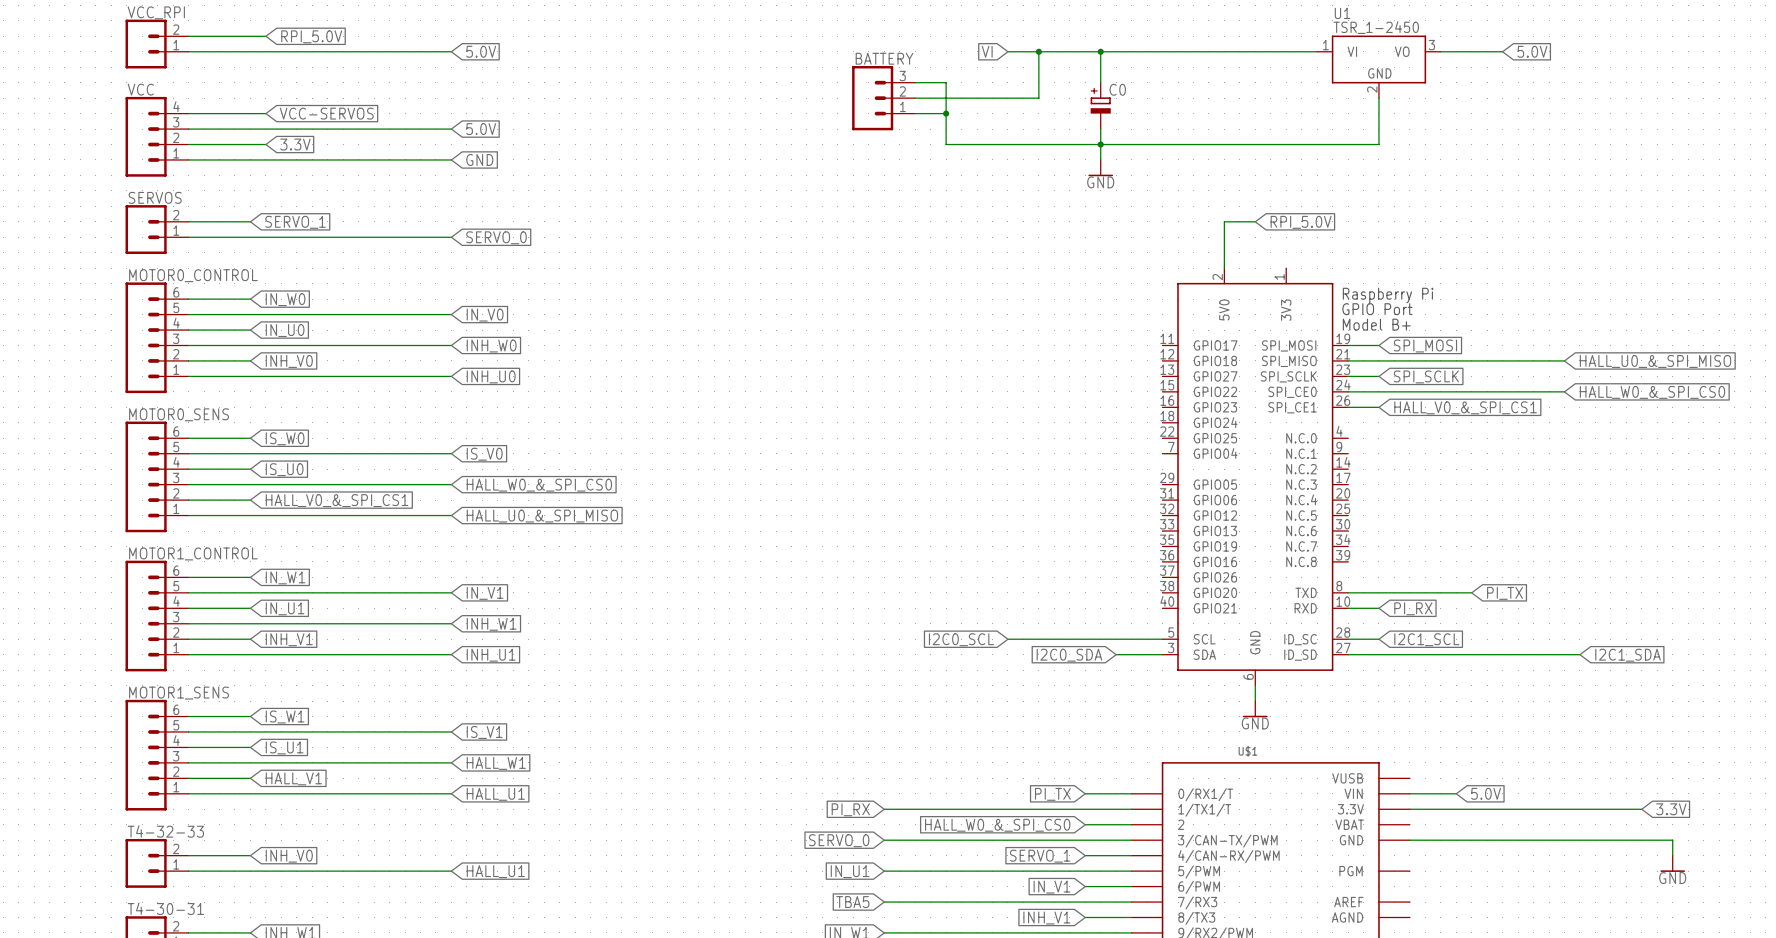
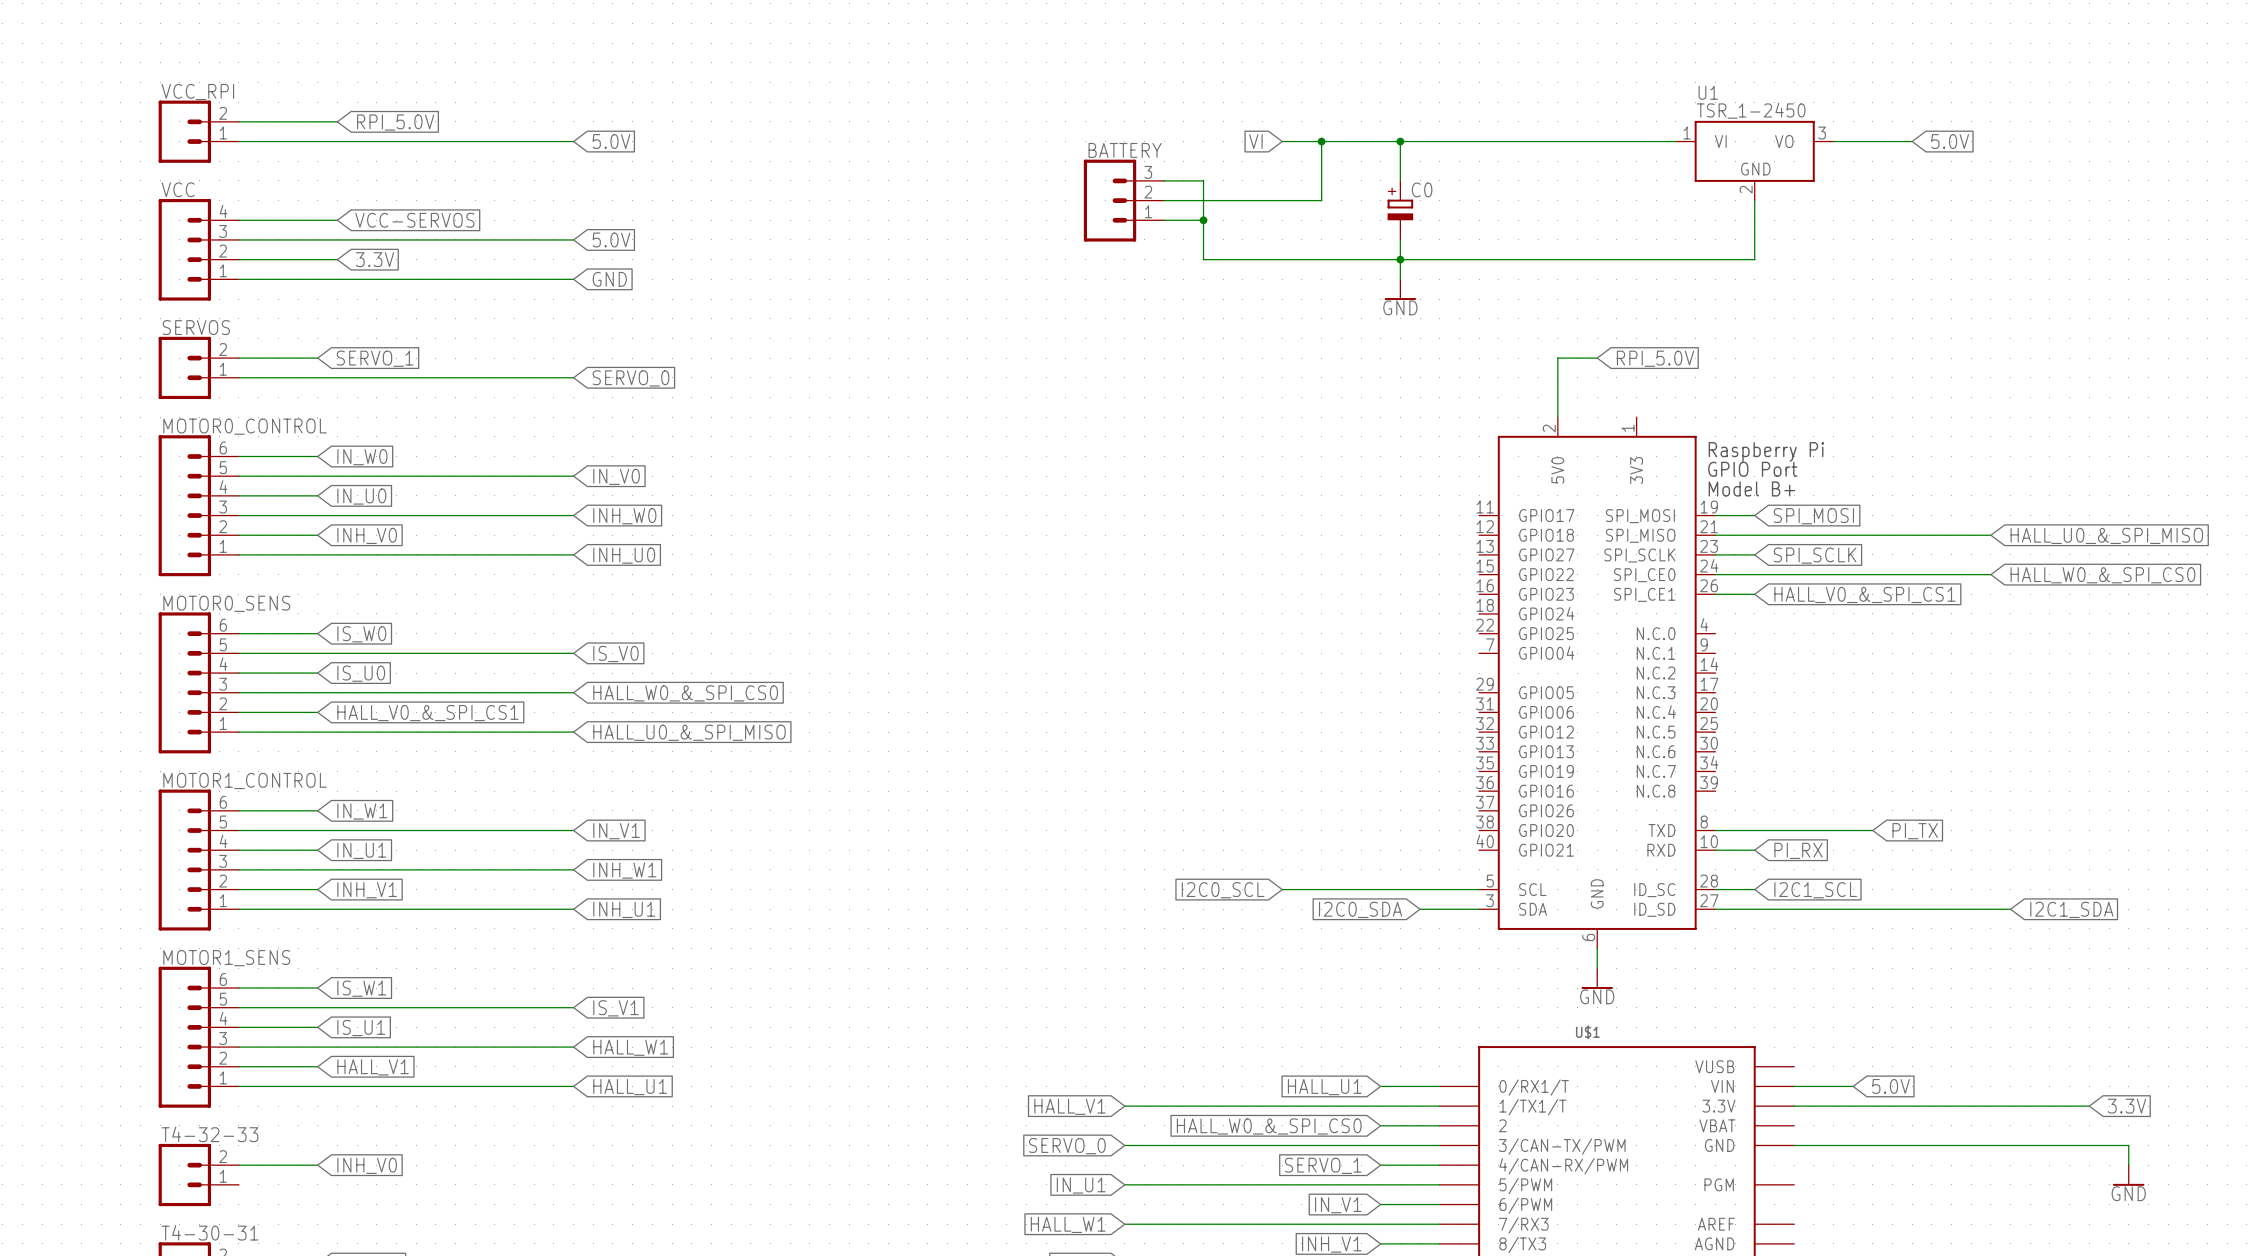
global label: PI_TX (1052, 794) -> HALL_U1 (1324, 1087)
global label: PI_RX (850, 809) -> HALL_V1 (1070, 1106)
wire: (188, 871) (451, 871) -> none
global label: HALL_U1 (495, 871) -> none
global label: TBA5 (852, 902) -> HALL_W1 (1068, 1224)

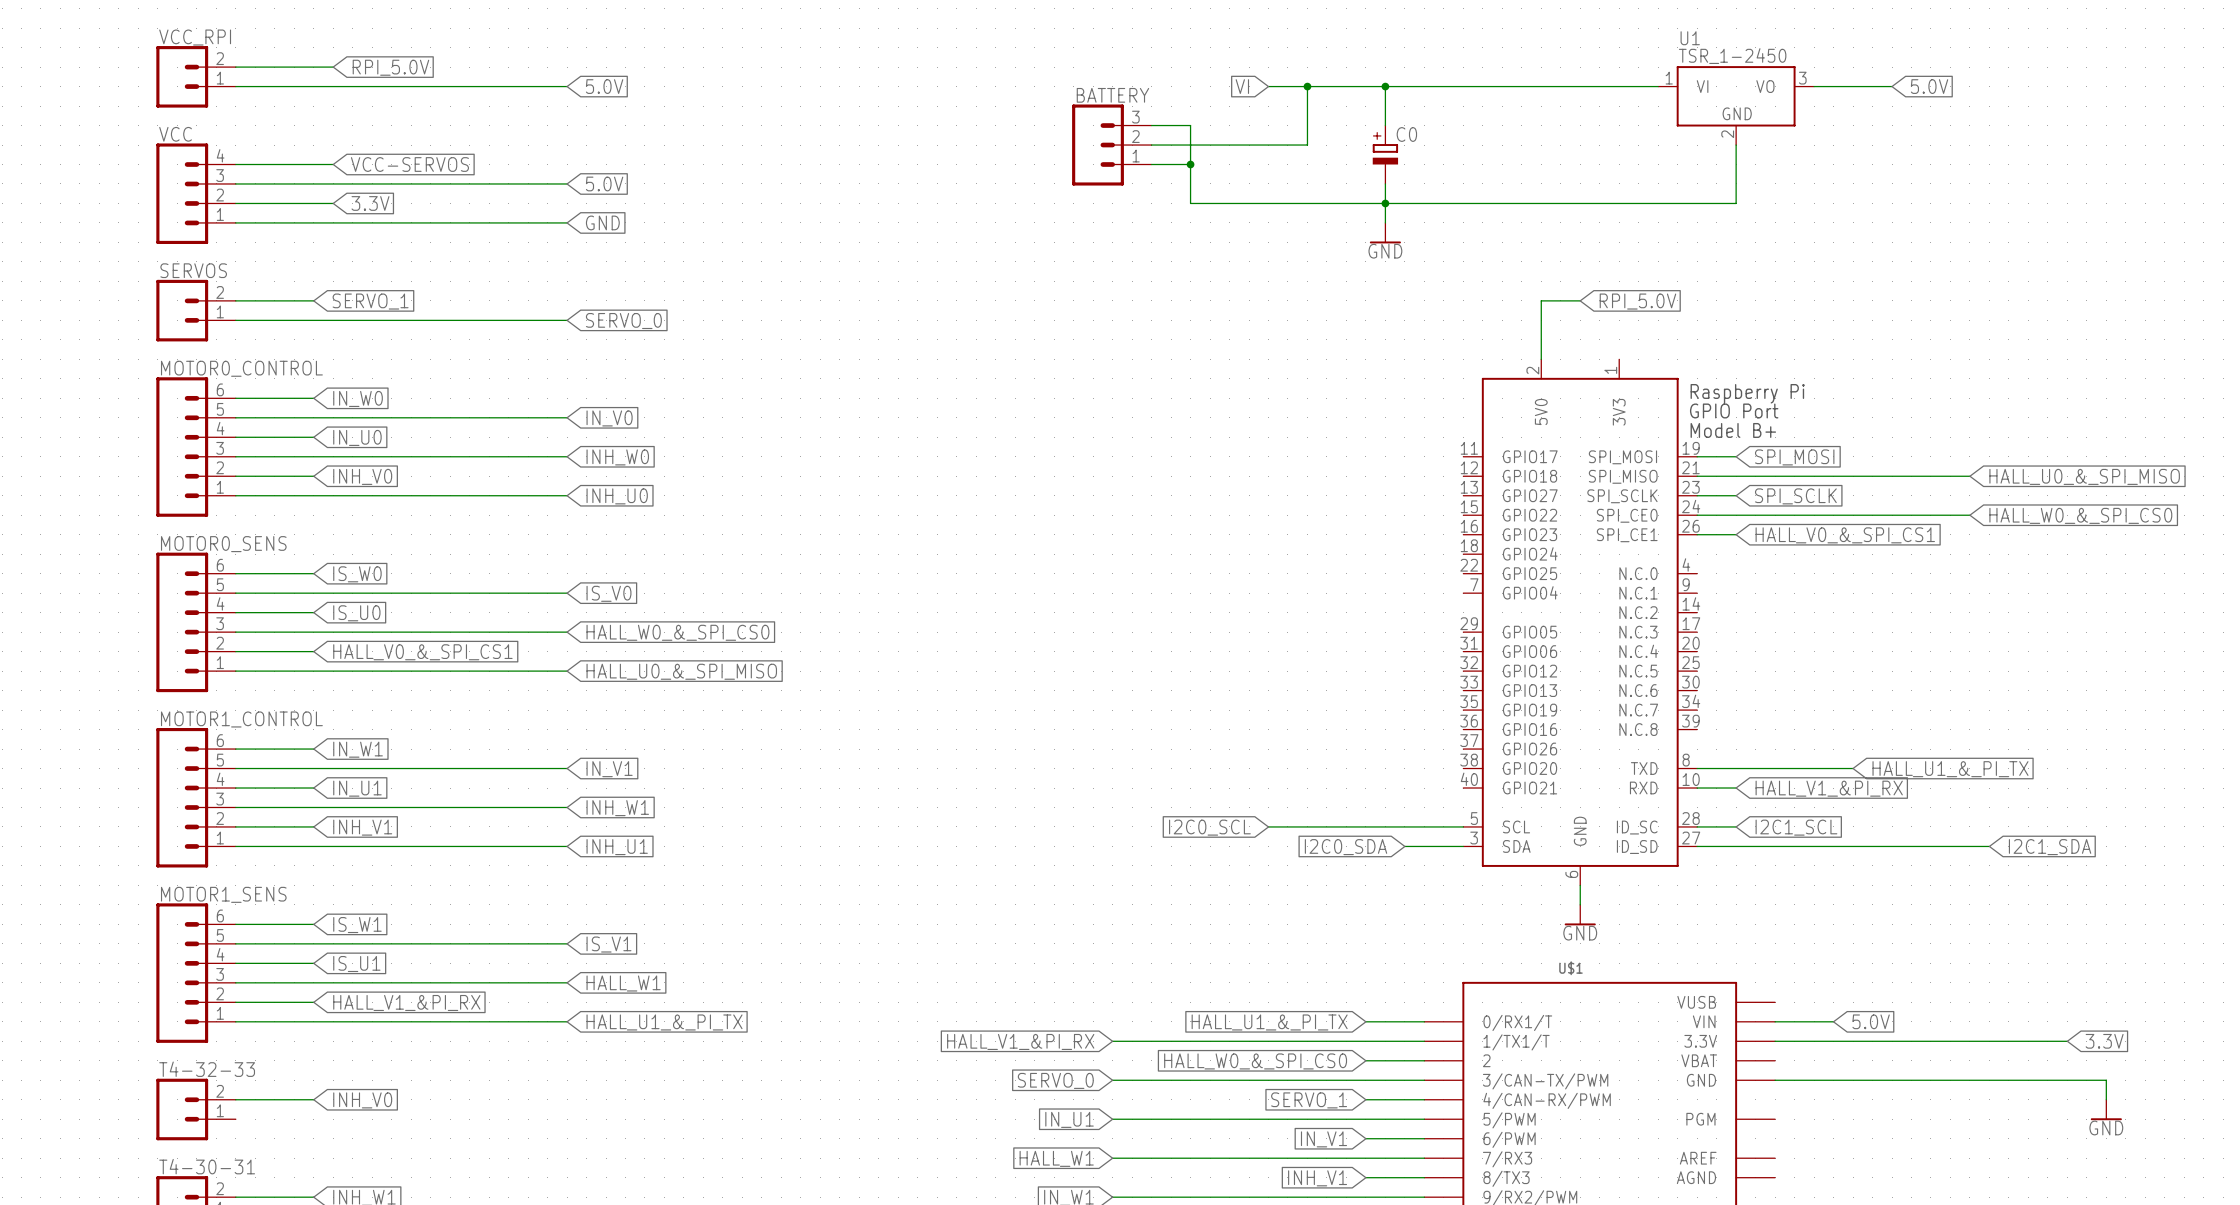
global label: PI_TX (1915, 831) -> HALL_U1_&_PI_TX (1950, 769)
global label: PI_RX (1798, 850) -> HALL_V1_&PI_RX (1829, 788)
global label: HALL_V1 (373, 1067) -> HALL_V1_&PI_RX (406, 1002)
global label: HALL_U1 (630, 1087) -> HALL_U1_&_PI_TX (664, 1022)
global label: HALL_U1 (1324, 1087) -> HALL_U1_&_PI_TX (1269, 1022)
global label: HALL_V1 (1070, 1106) -> HALL_V1_&PI_RX (1020, 1041)

